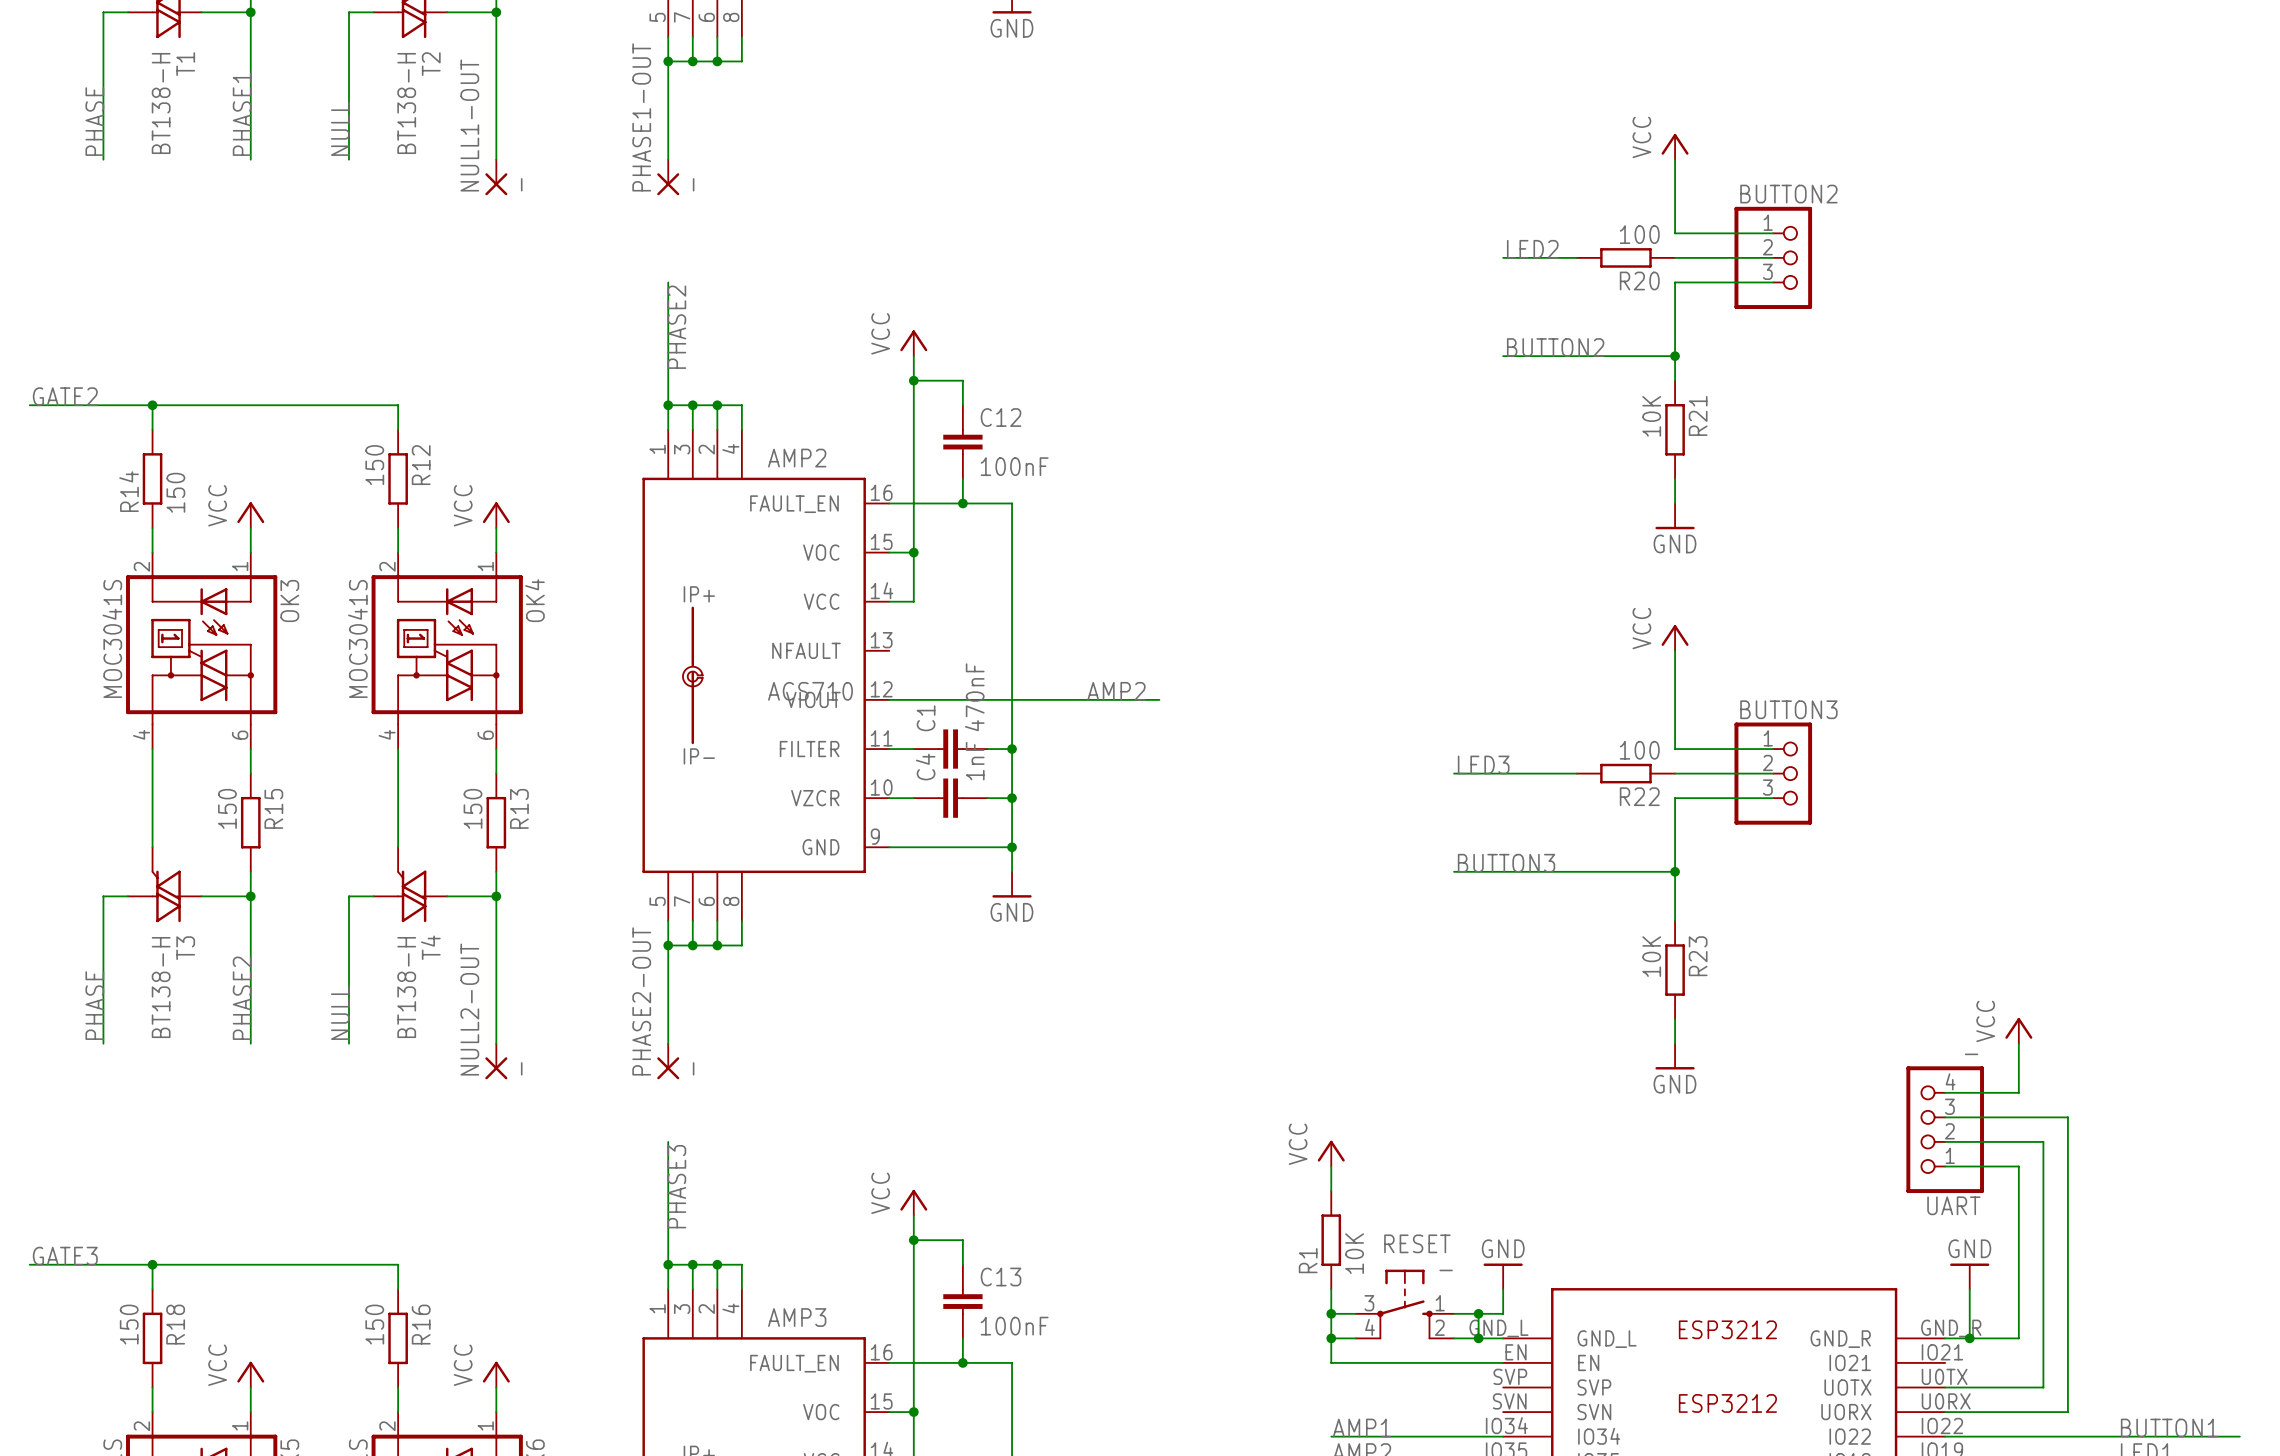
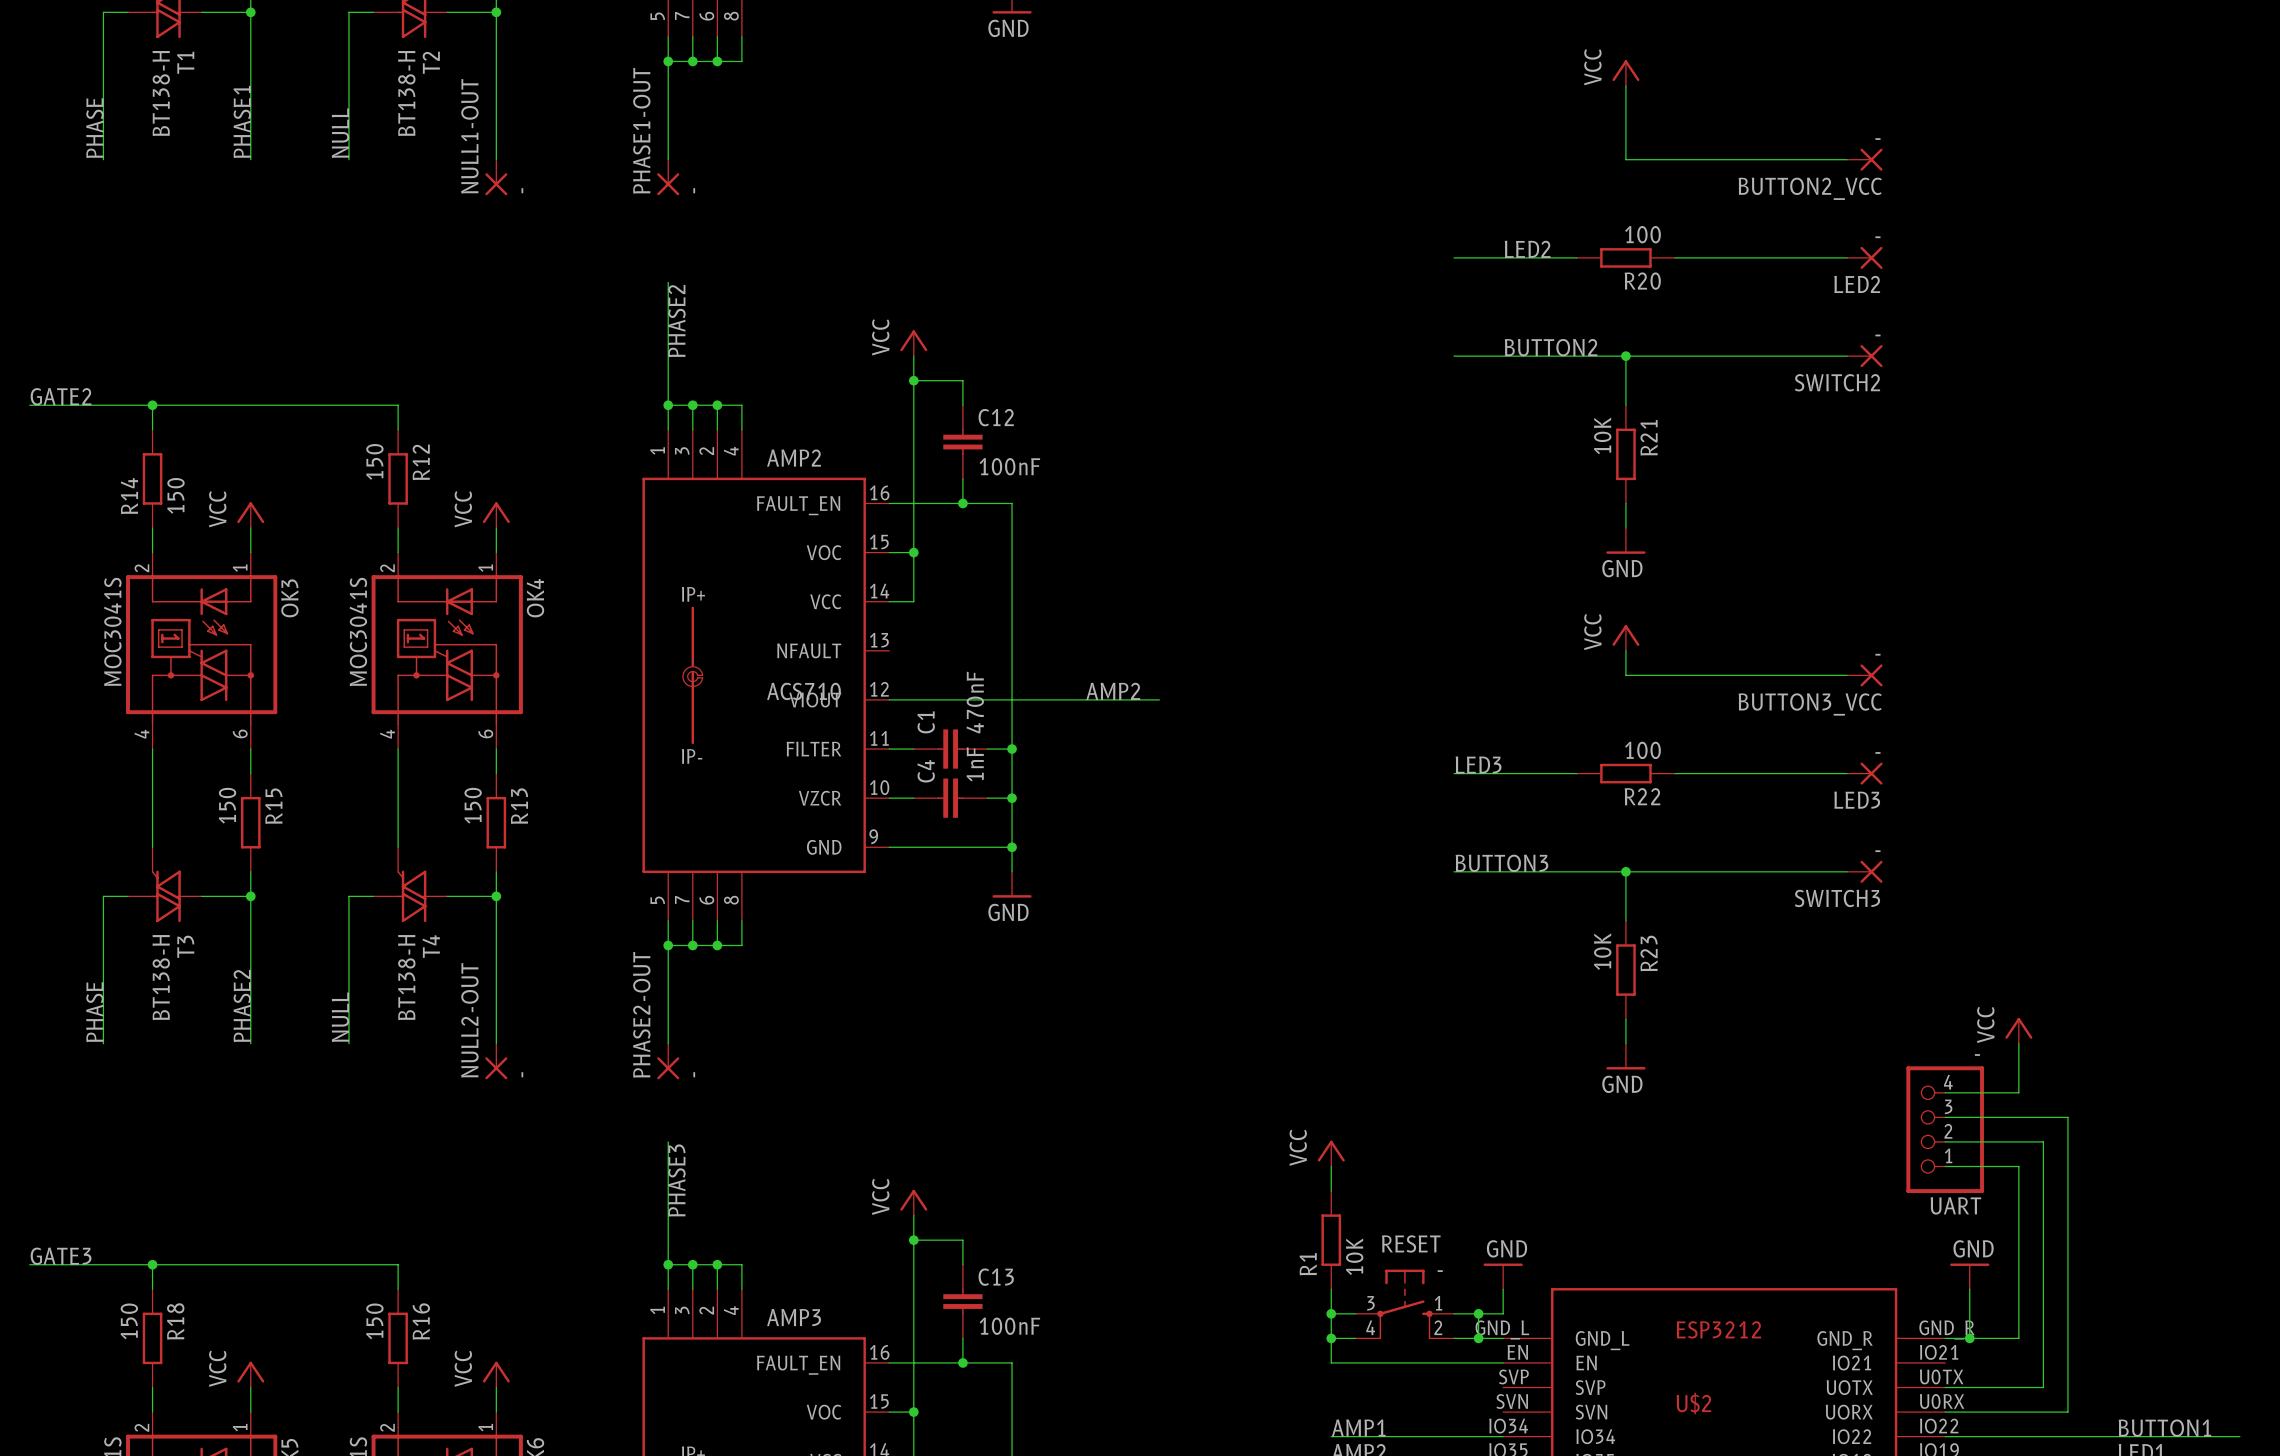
wire: none -> (1625, 86) (1625, 159) (1846, 159)
power symbol position: VCC (1675, 146) -> VCC (1625, 73)
wire: (1675, 159) (1675, 233) (1773, 233) -> none
BUTTON2_VCC: none -> - (1864, 159)
wire: none -> (1454, 257) (1503, 257)
wire: none -> (1773, 257) (1846, 257)
BUTTON2: (1773, 257) -> none
LED2: none -> - (1864, 257)
wire: (1773, 282) (1675, 282) (1675, 380) -> none
wire: none -> (1454, 356) (1503, 356)
wire: none -> (1625, 356) (1625, 405)
wire: none -> (1675, 356) (1846, 356)
junction position: (1675, 356) -> (1625, 356)
SWITCH2: none -> - (1864, 356)
R21 position: (1675, 429) -> (1625, 454)
wire: (1675, 478) (1675, 503) -> (1625, 503) (1625, 528)
power symbol position: GND (1675, 516) -> GND (1625, 540)
power symbol position: VCC (1675, 637) -> VCC (1625, 637)
wire: none -> (1625, 650) (1625, 675) (1846, 675)
wire: (1675, 650) (1675, 749) (1773, 749) -> none
BUTTON3_VCC: none -> - (1864, 675)
wire: none -> (1773, 773) (1846, 773)
BUTTON3: (1773, 773) -> none
LED3: none -> - (1864, 773)
wire: (1773, 798) (1675, 798) (1675, 920) -> none
wire: none -> (1625, 871) (1625, 920)
wire: none -> (1675, 871) (1846, 871)
junction position: (1675, 871) -> (1625, 871)
SWITCH3: none -> - (1864, 871)
R23 position: (1675, 970) -> (1625, 970)
wire: (1675, 1019) (1675, 1043) -> (1625, 1019) (1625, 1043)
power symbol position: GND (1675, 1056) -> GND (1625, 1056)
ESP3212 name: ESP3212 (1727, 1403) -> U$2 (1693, 1403)

